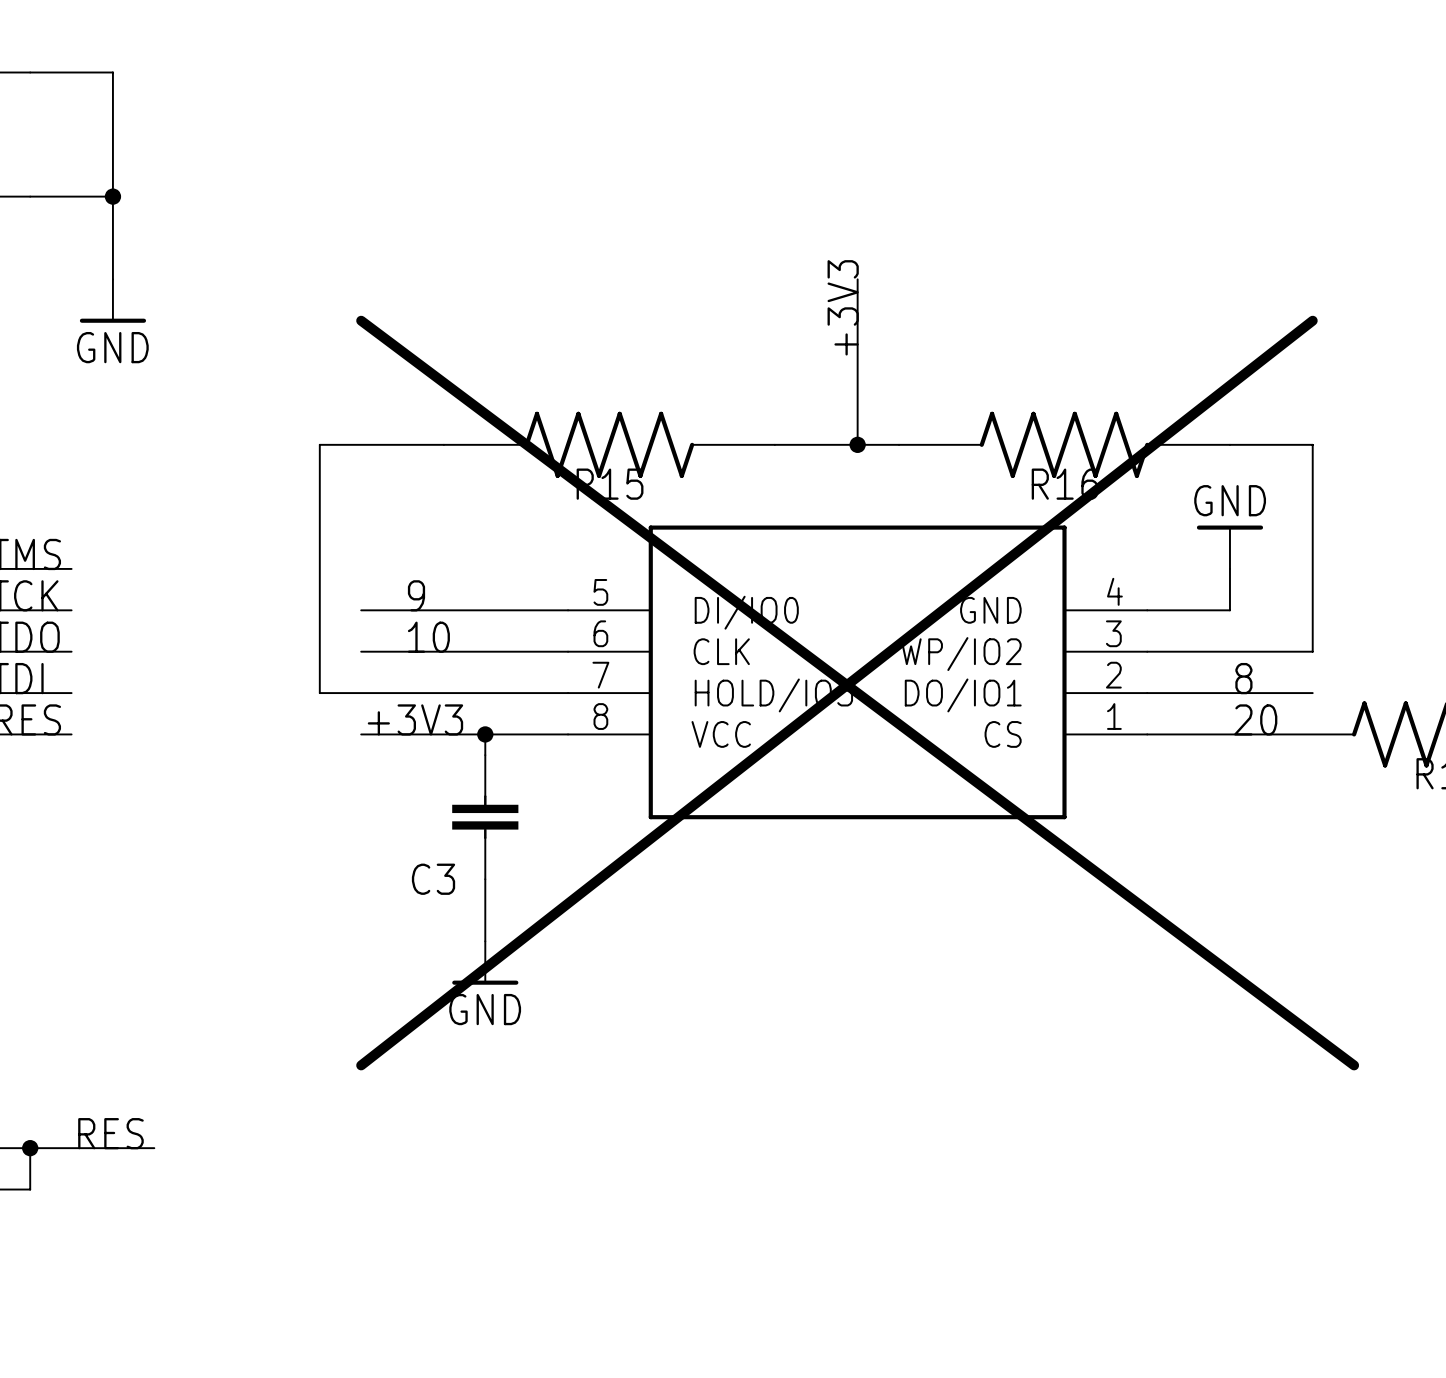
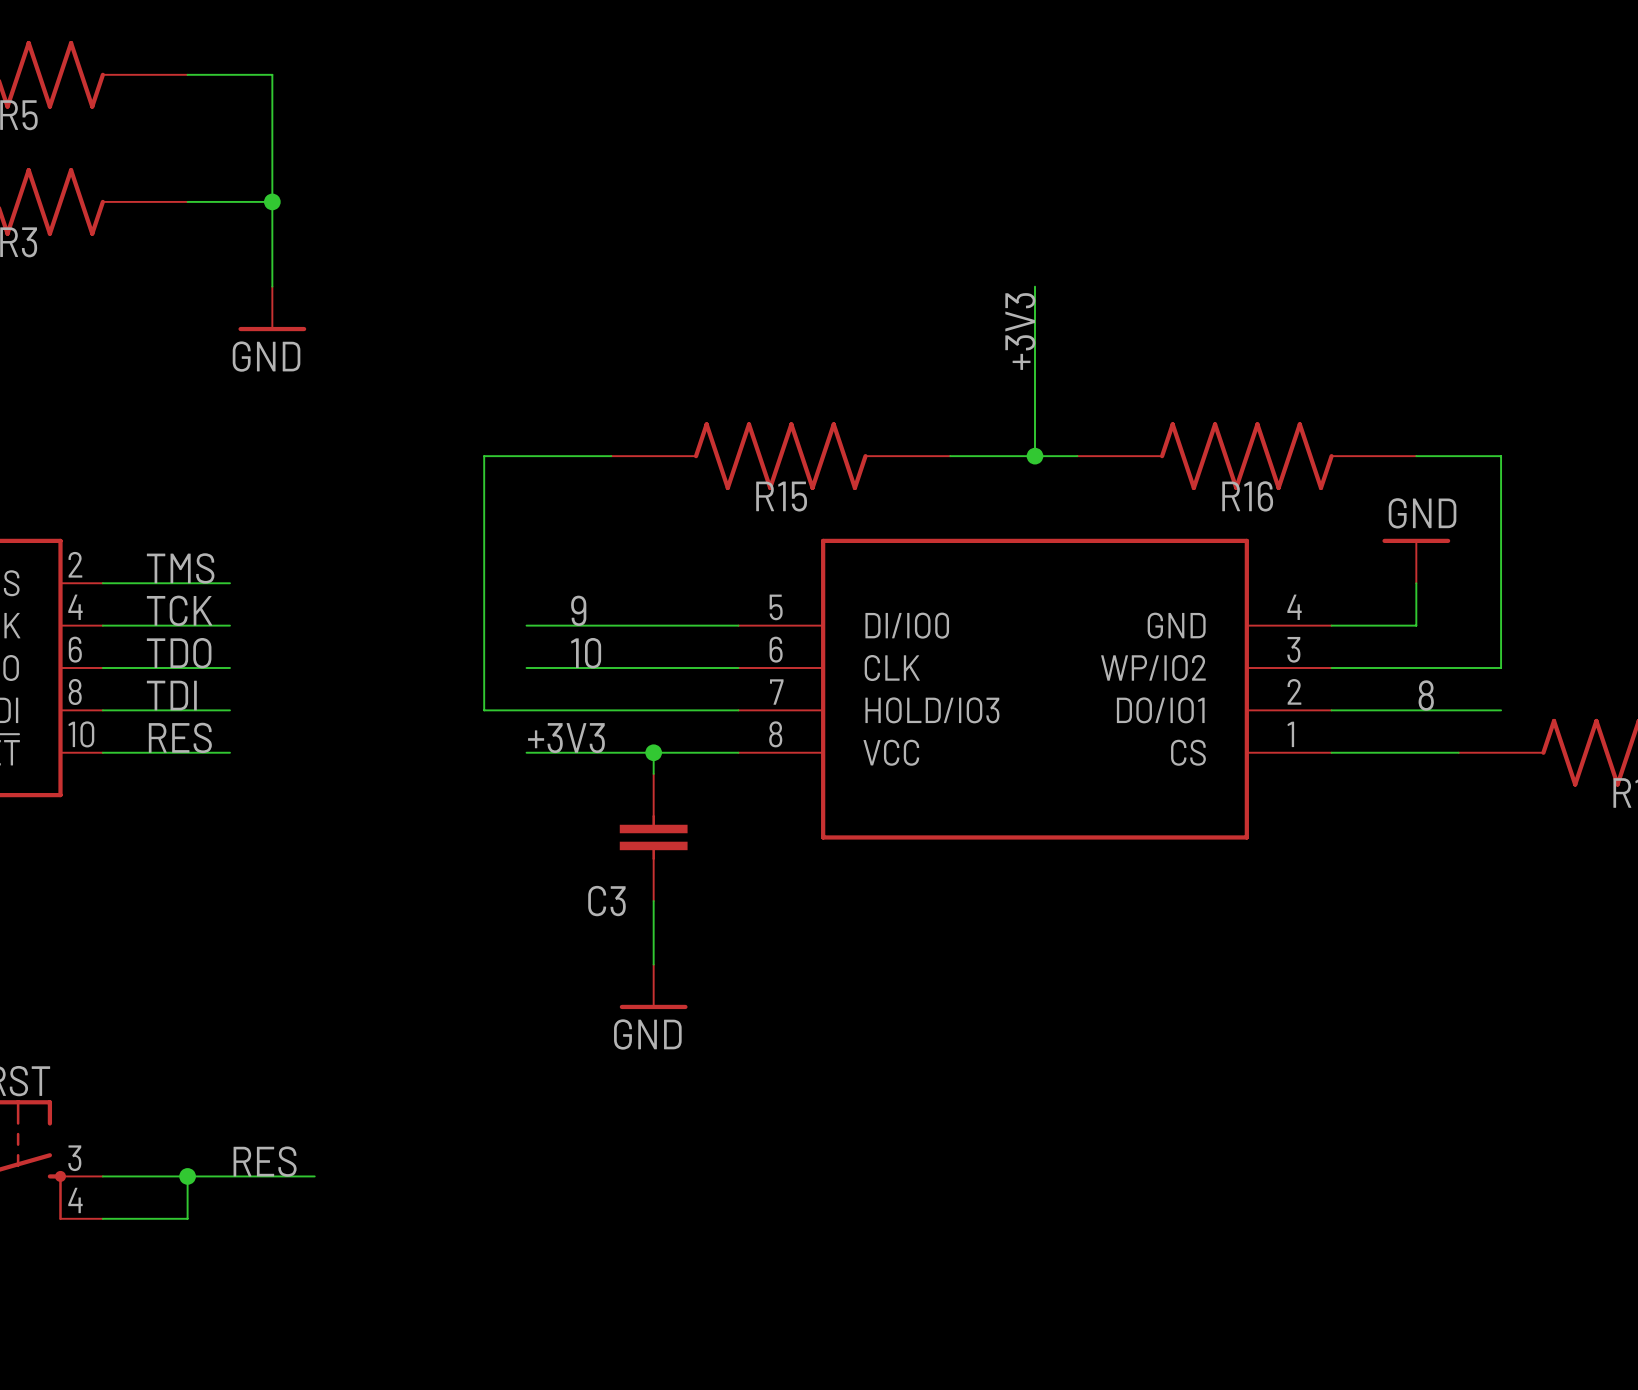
line: (361, 320) (1354, 1065) -> none
line: (1312, 320) (361, 1065) -> none
label: 20 (1255, 719) -> none

